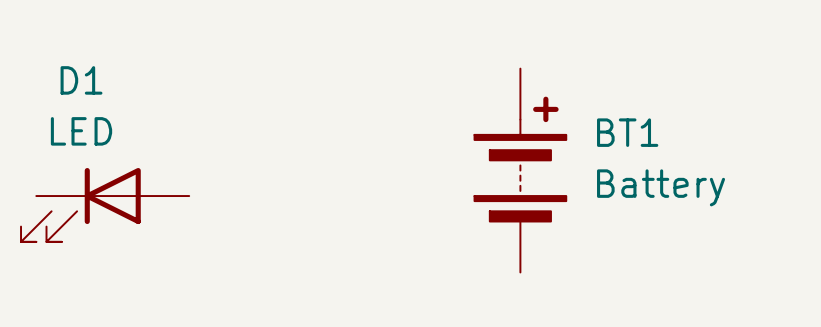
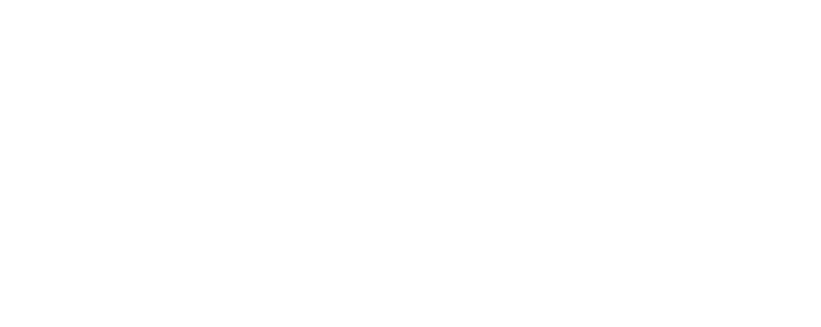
BT1: Battery (520, 170) -> none
D1: LED (105, 204) -> none

